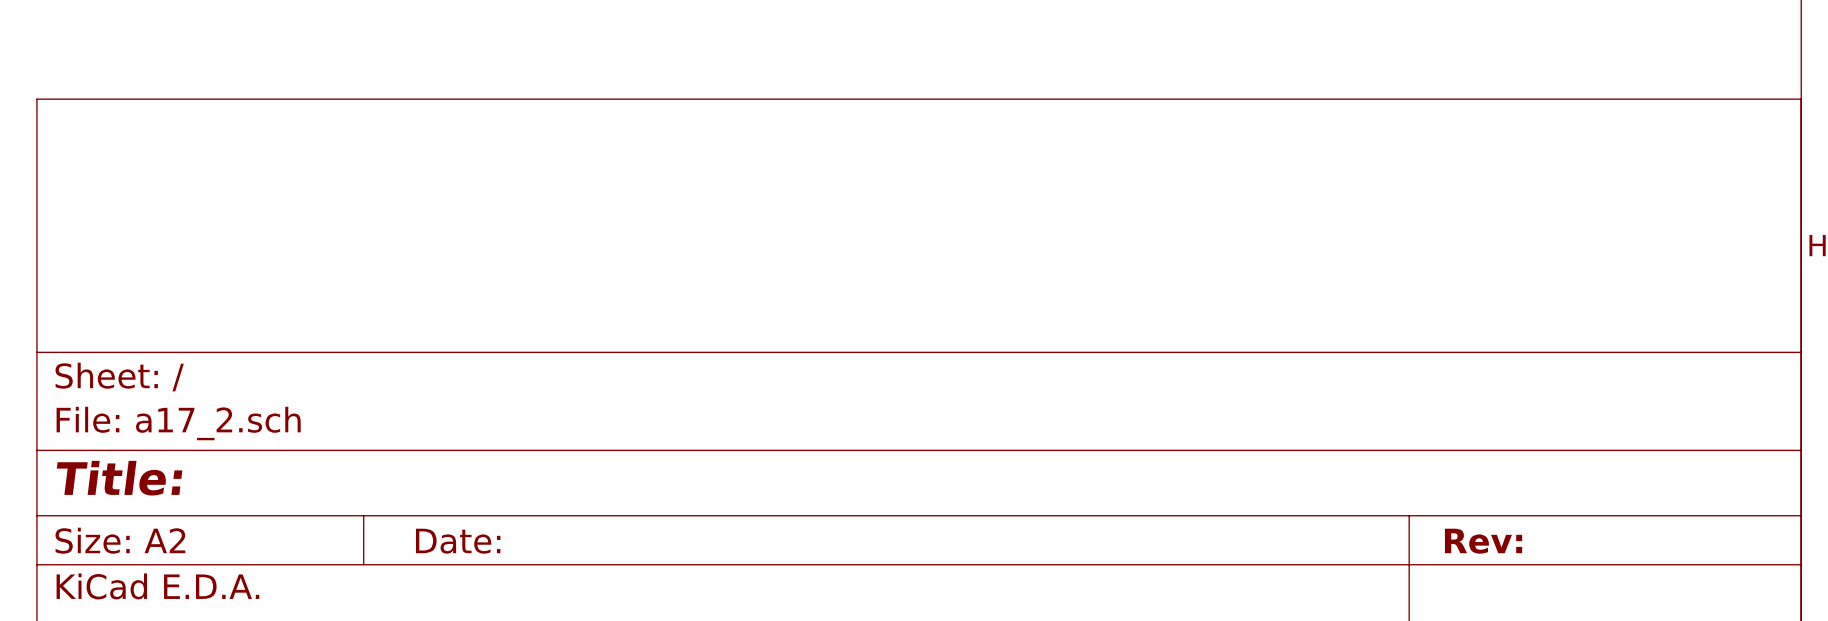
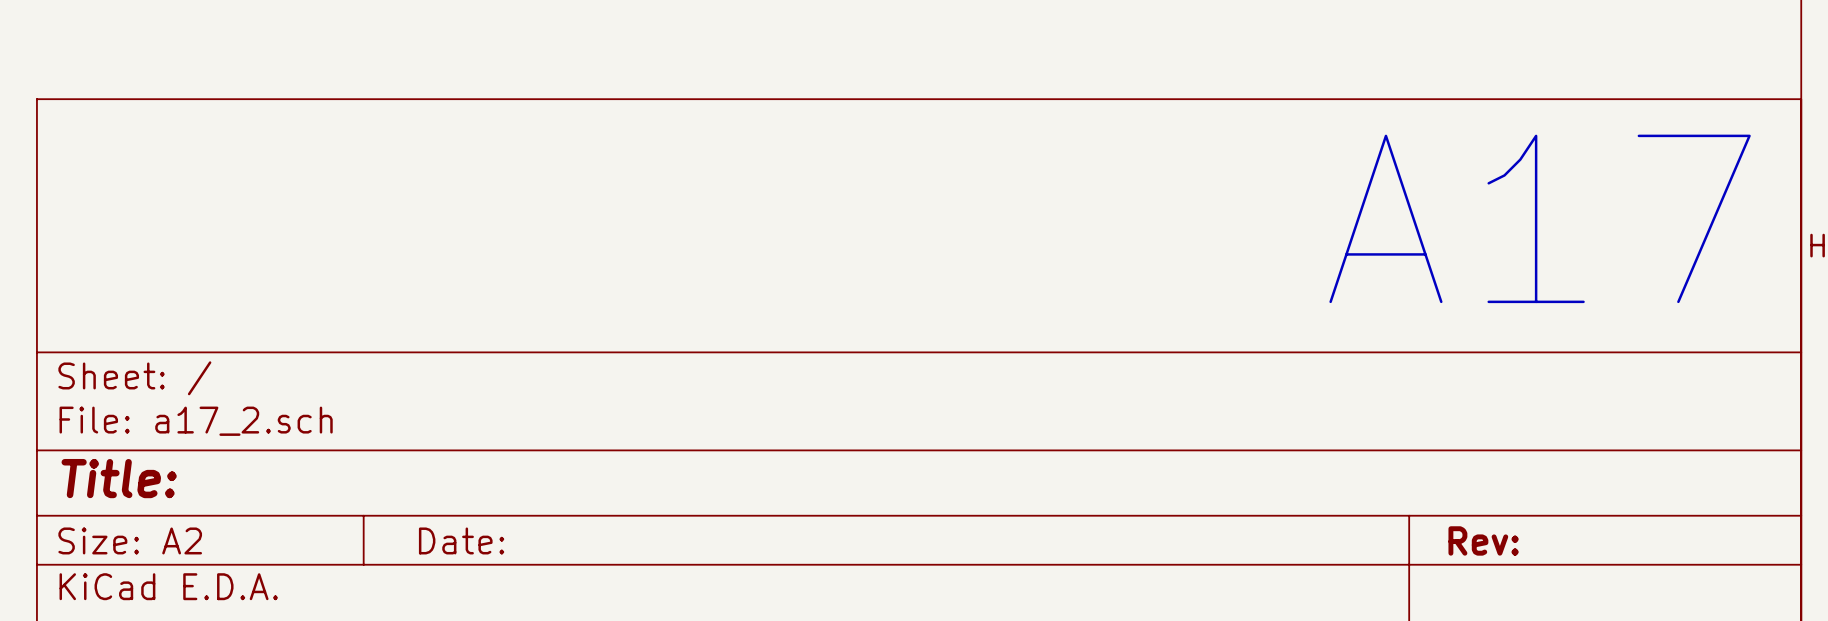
text: none -> A17 (1540, 218)

